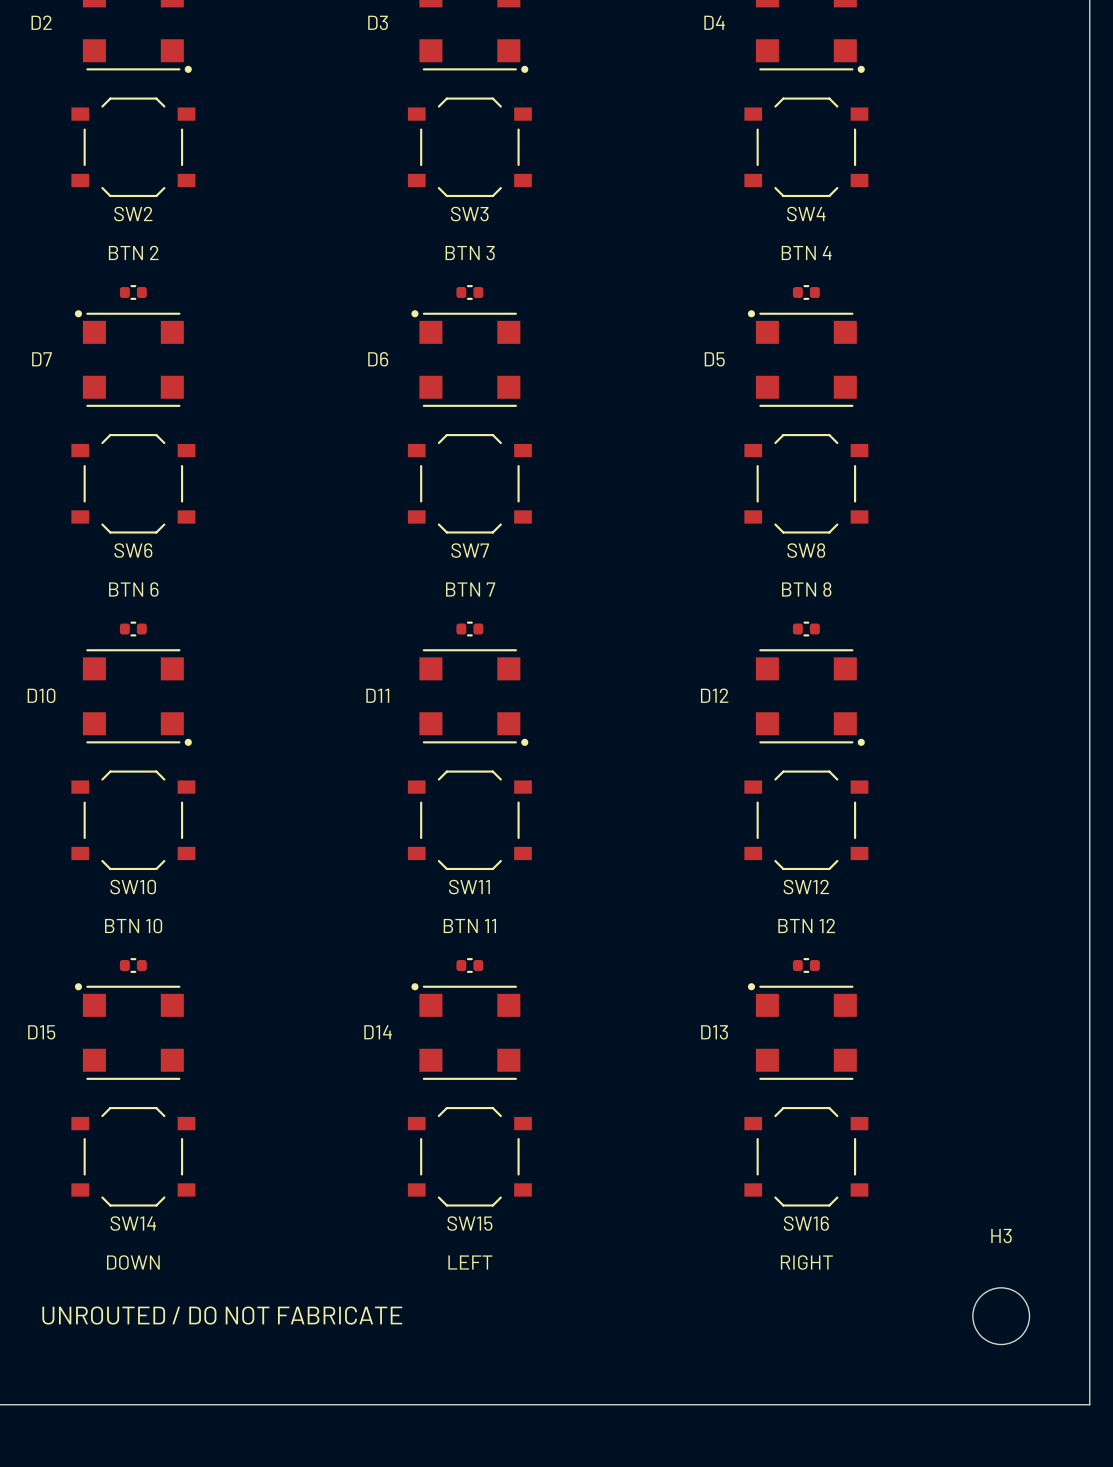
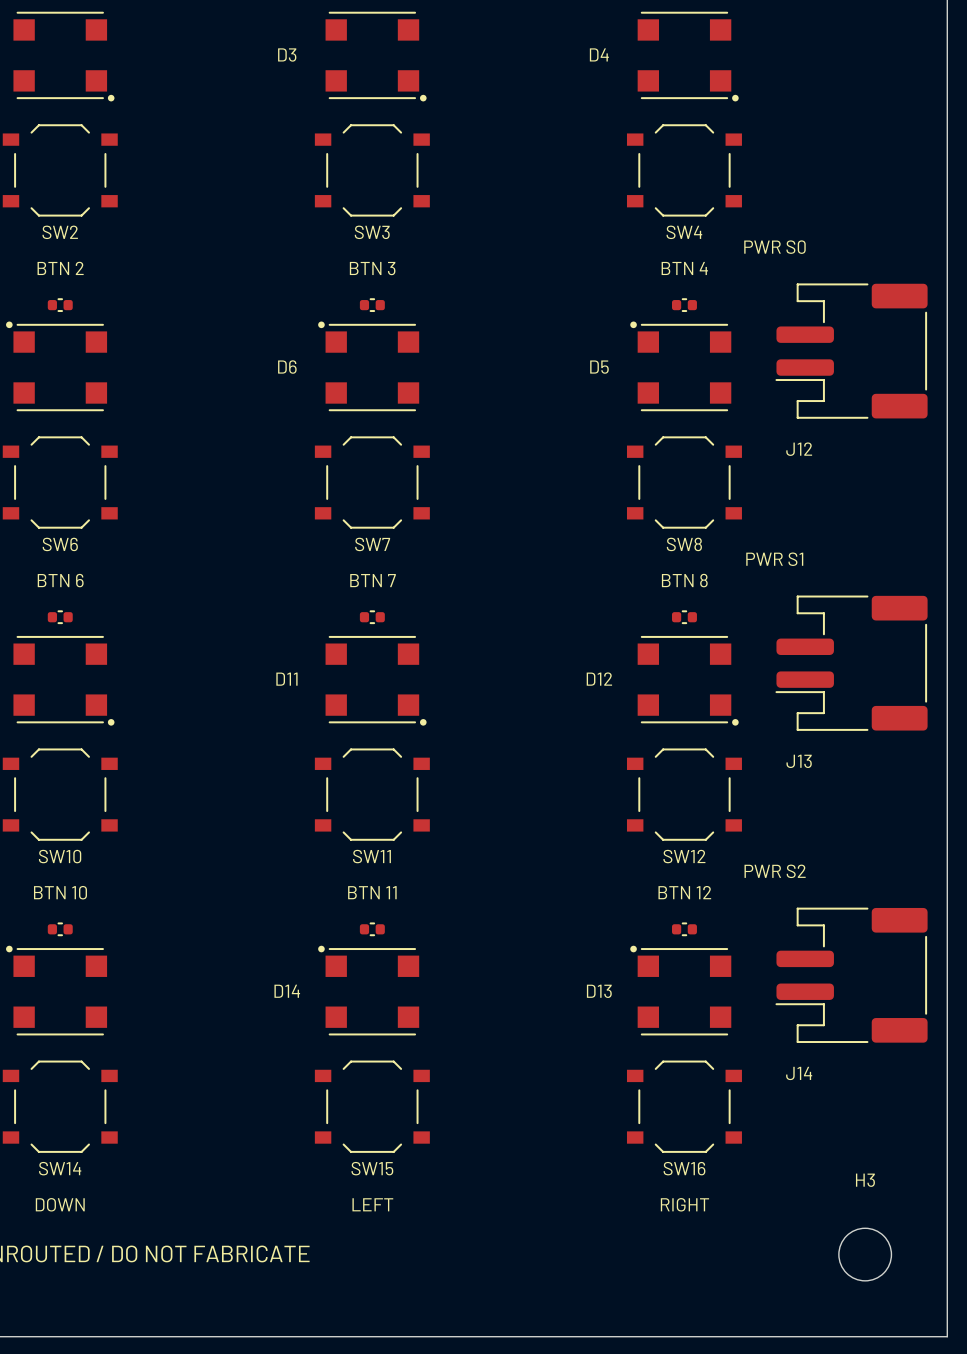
text: none -> PWR S0 (774, 247)
J12: none -> (851, 351)
text: none -> PWR S1 (774, 559)
J13: none -> (851, 663)
text: none -> PWR S2 (775, 871)
J14: none -> (851, 975)

